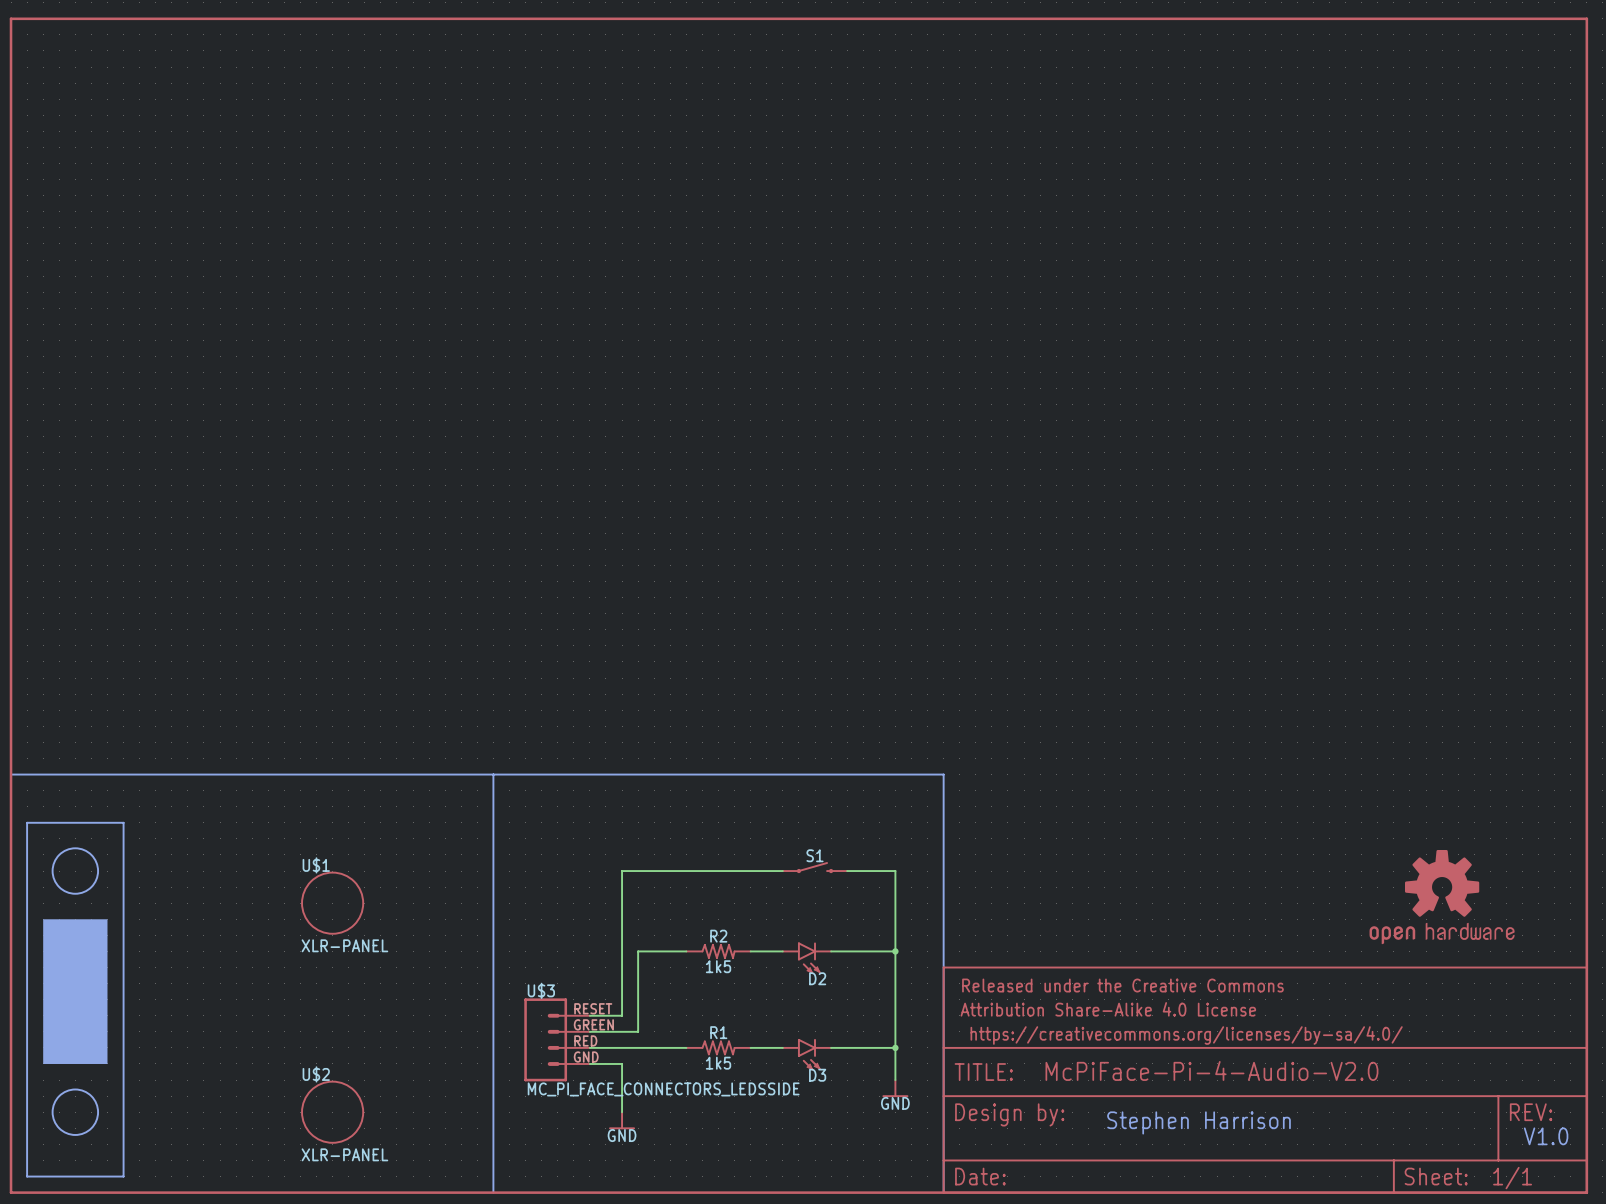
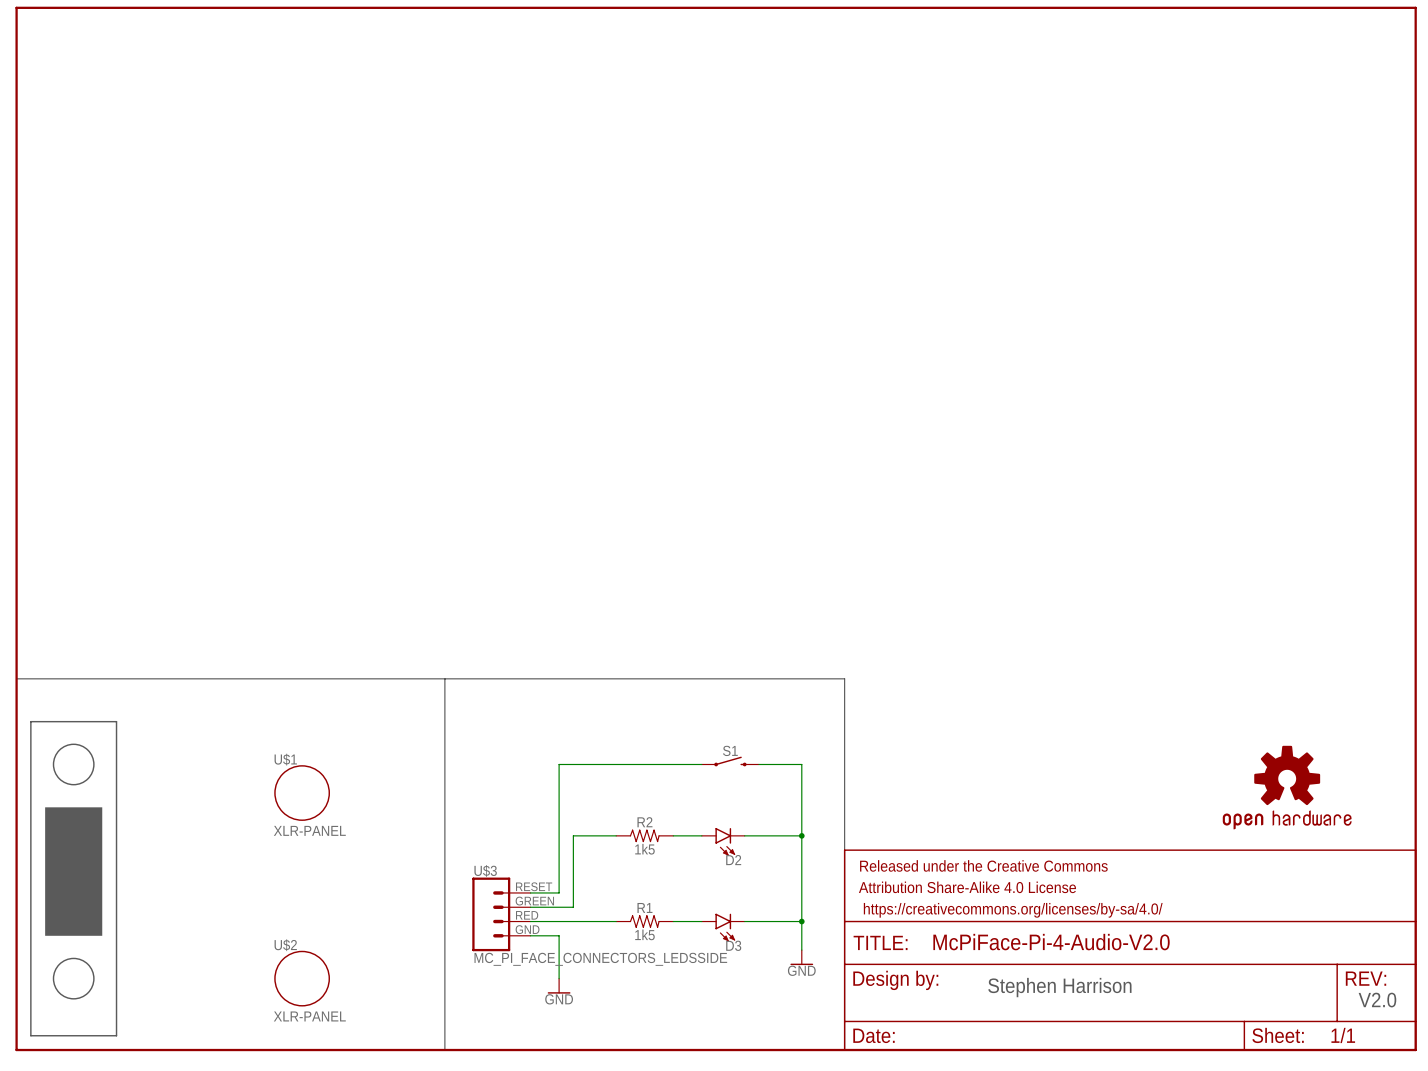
text: V1.0 (1546, 1136) -> V2.0 (1377, 1000)

